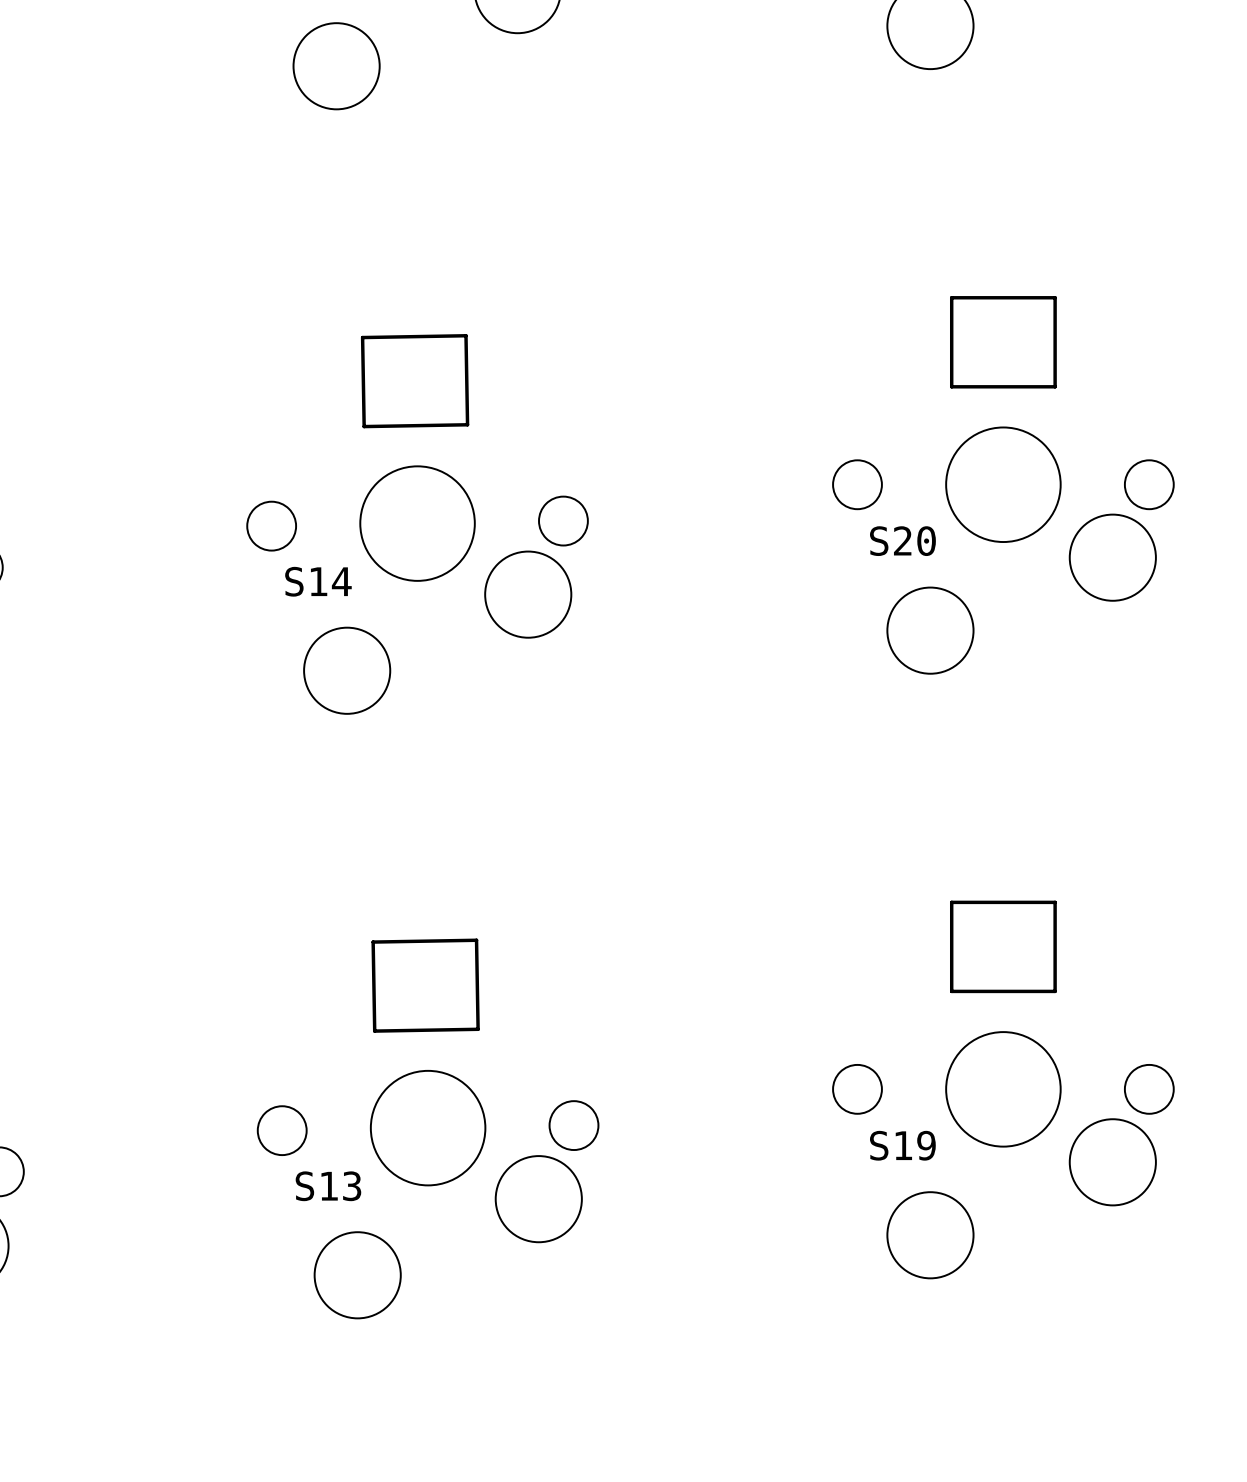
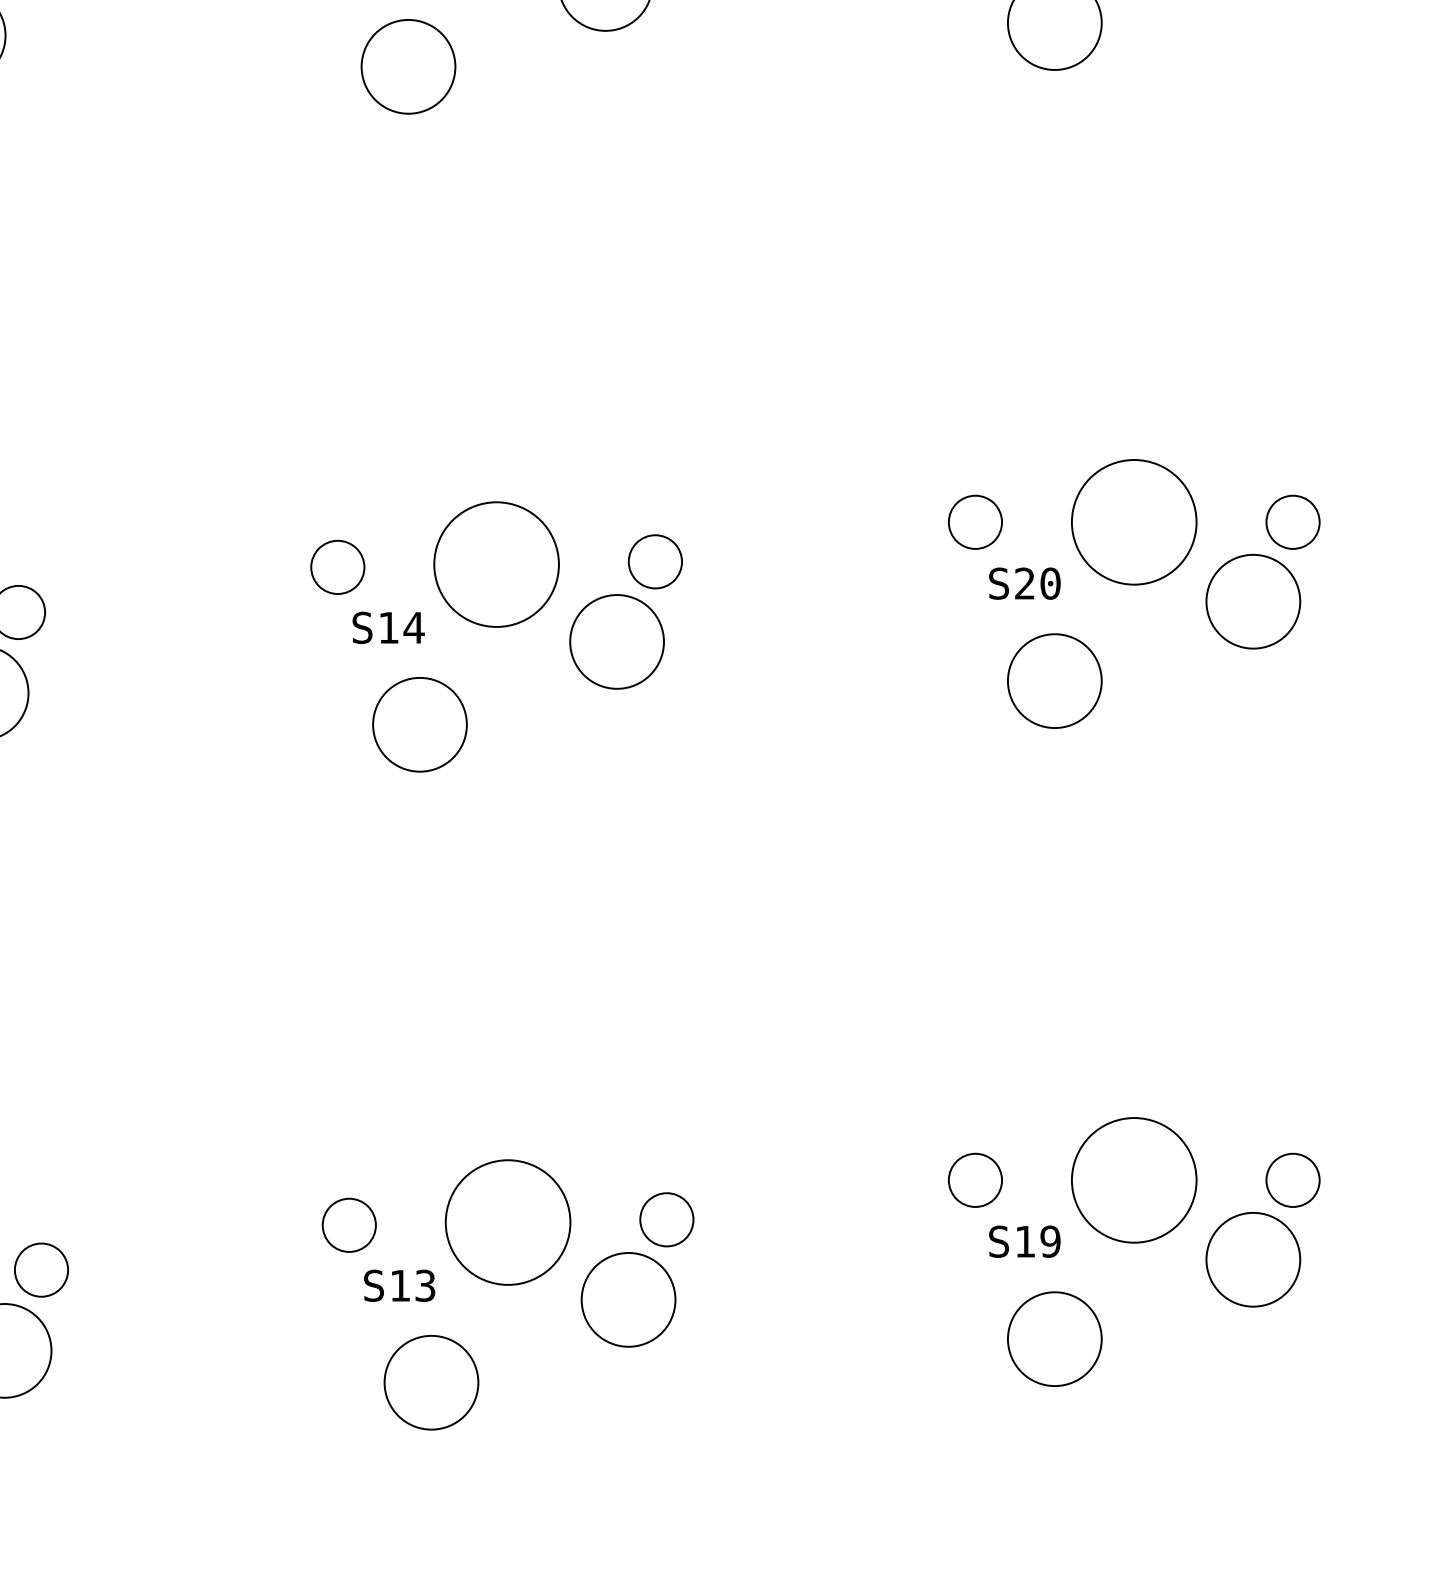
part: (1003, 342) -> none
part: (415, 381) -> none
part: (1003, 946) -> none
part: (425, 985) -> none

